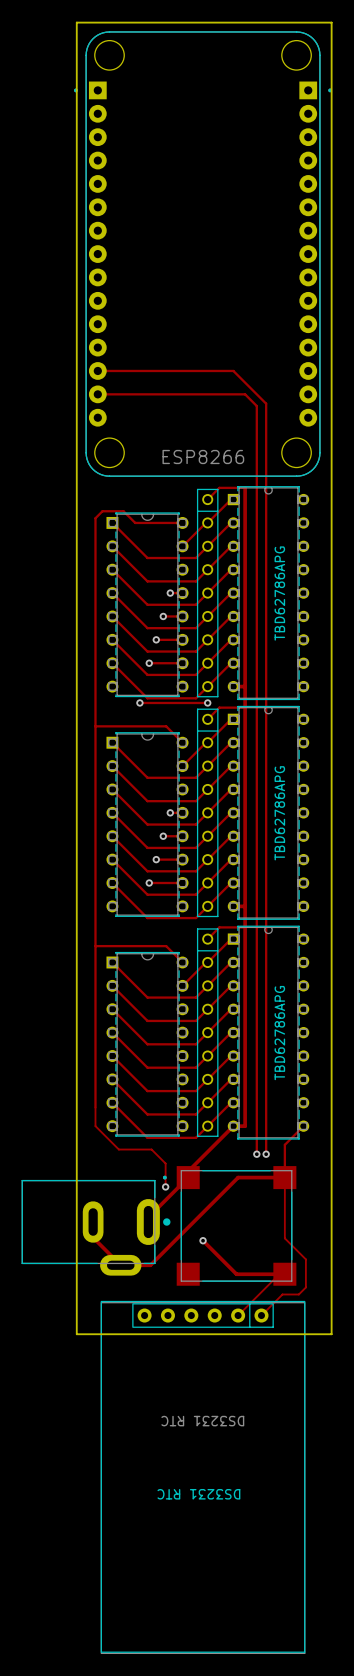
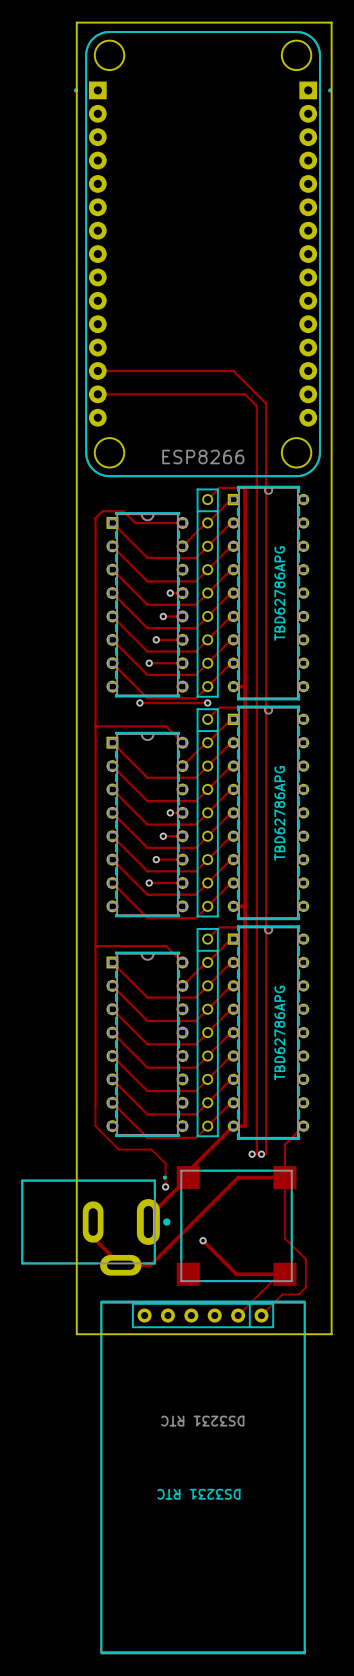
via: none -> (252, 1154)
via: (256, 1154) -> none
via: none -> (261, 1154)
via: (266, 1154) -> none

